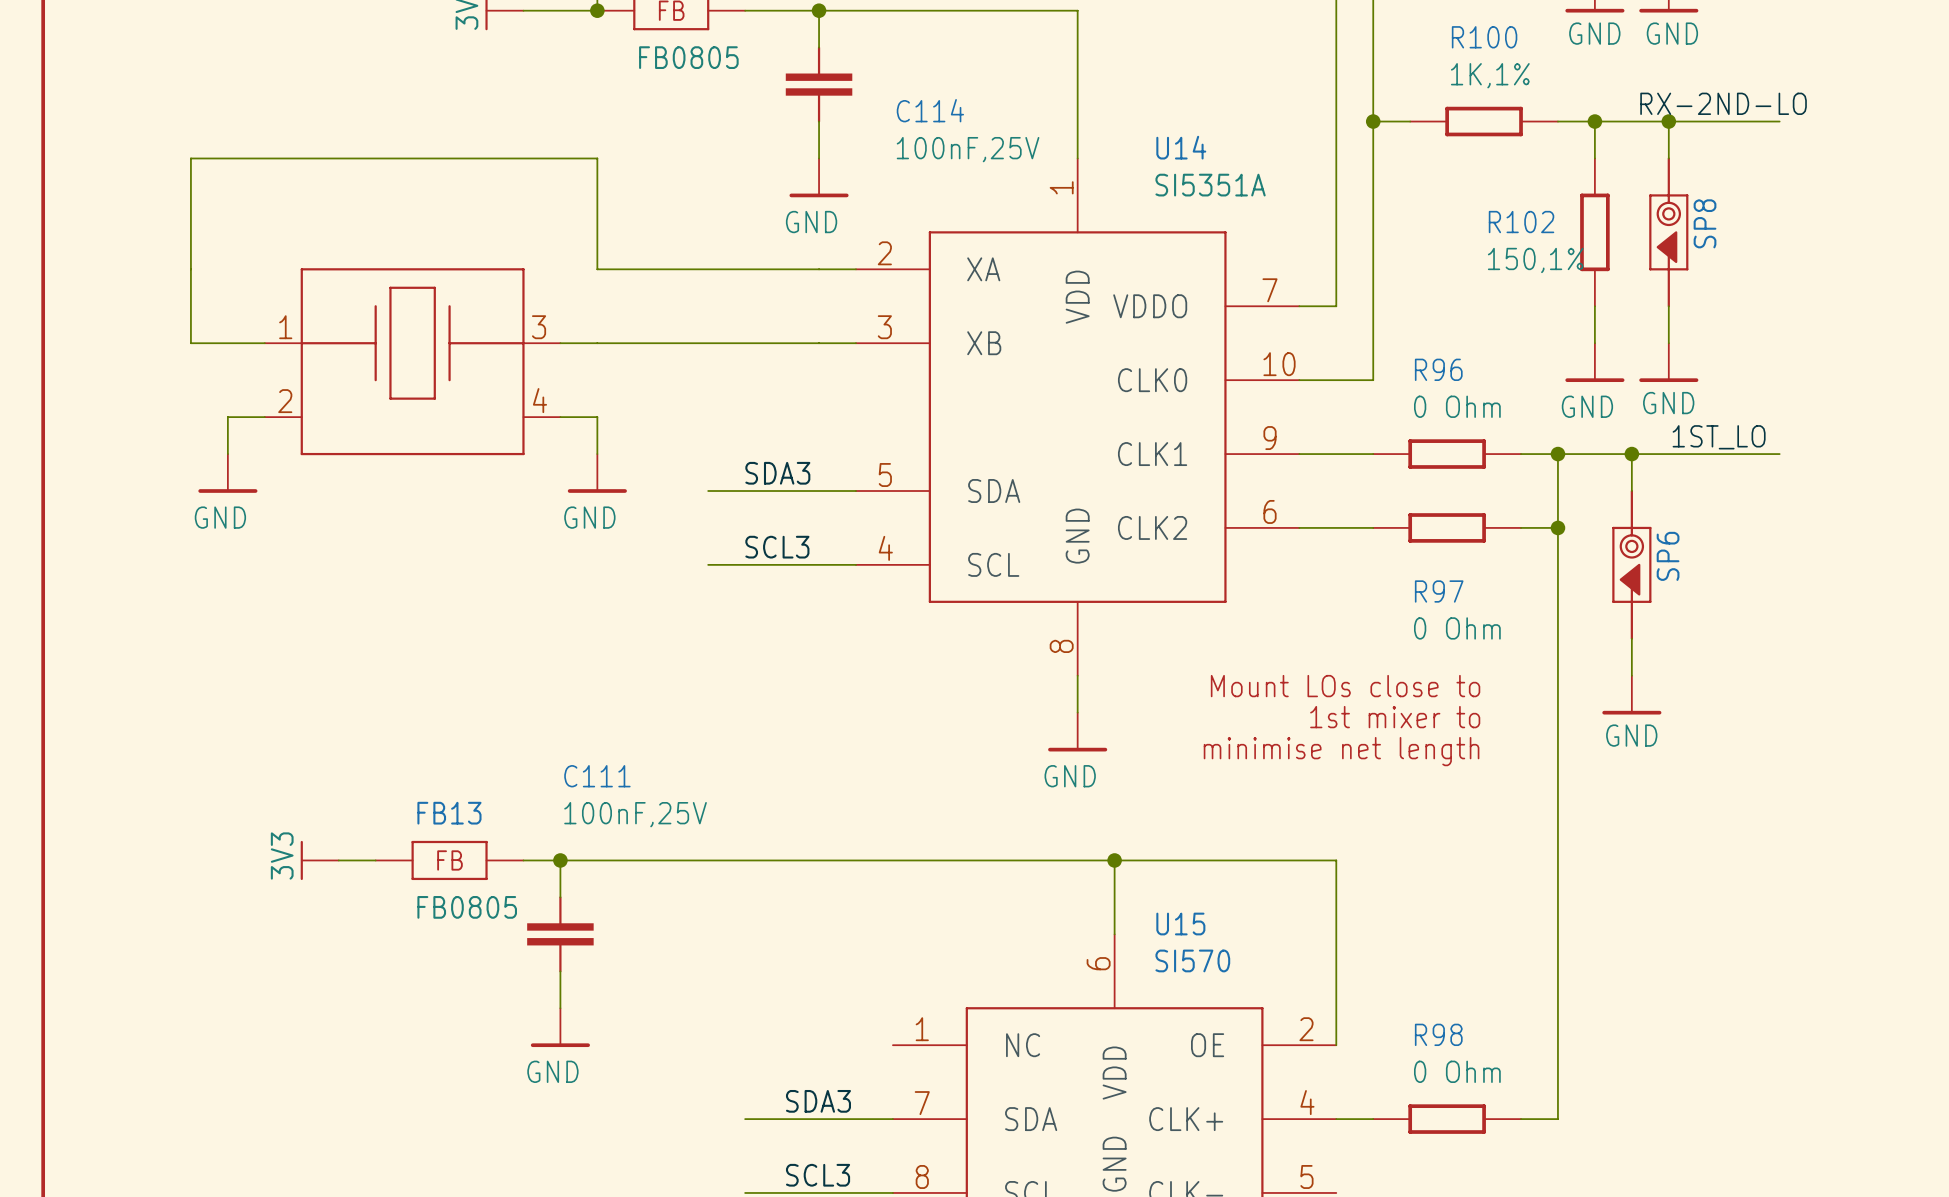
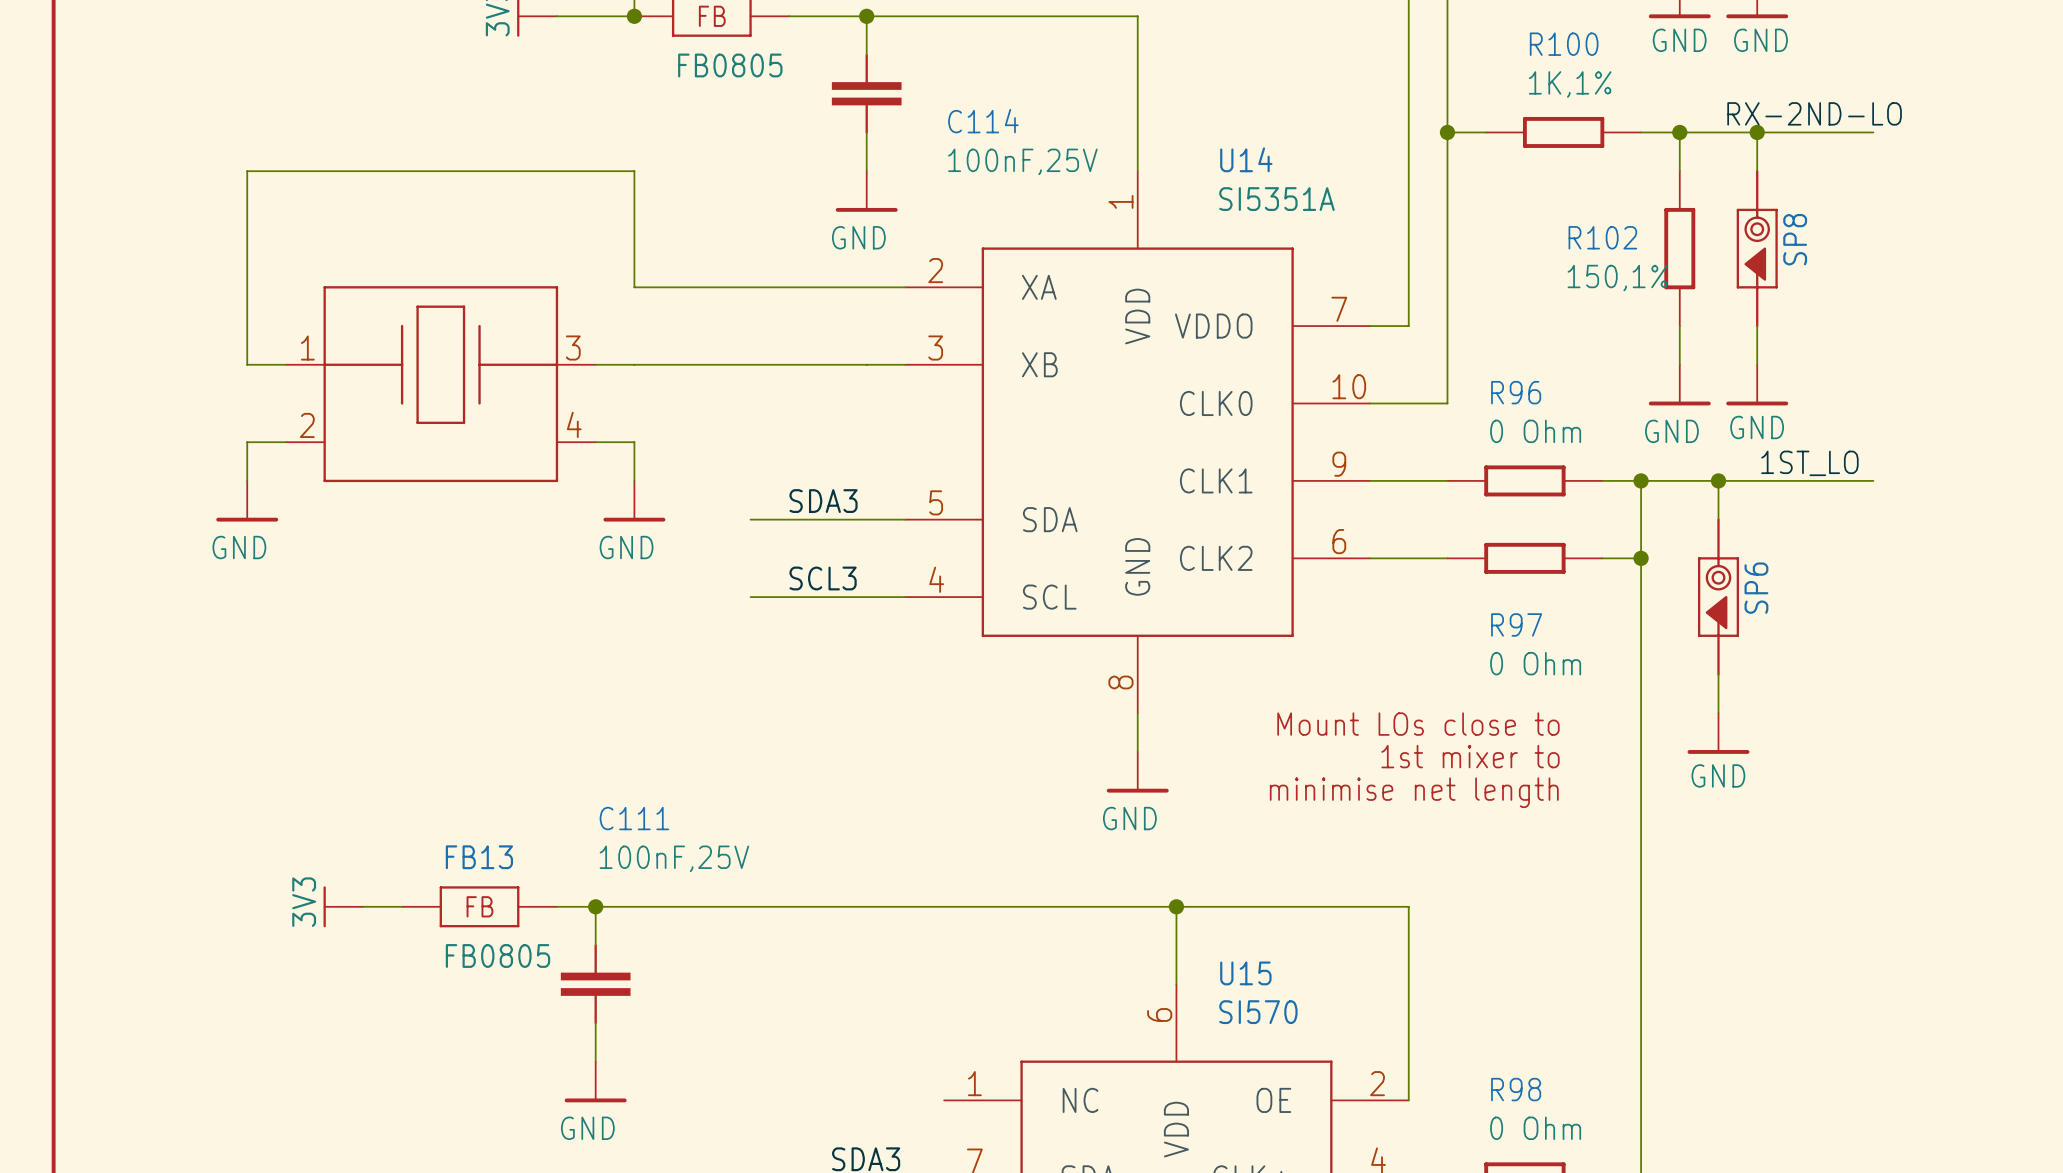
wire: (227, 158) (190, 158) (190, 343) (227, 343) -> (247, 171) (247, 364)

